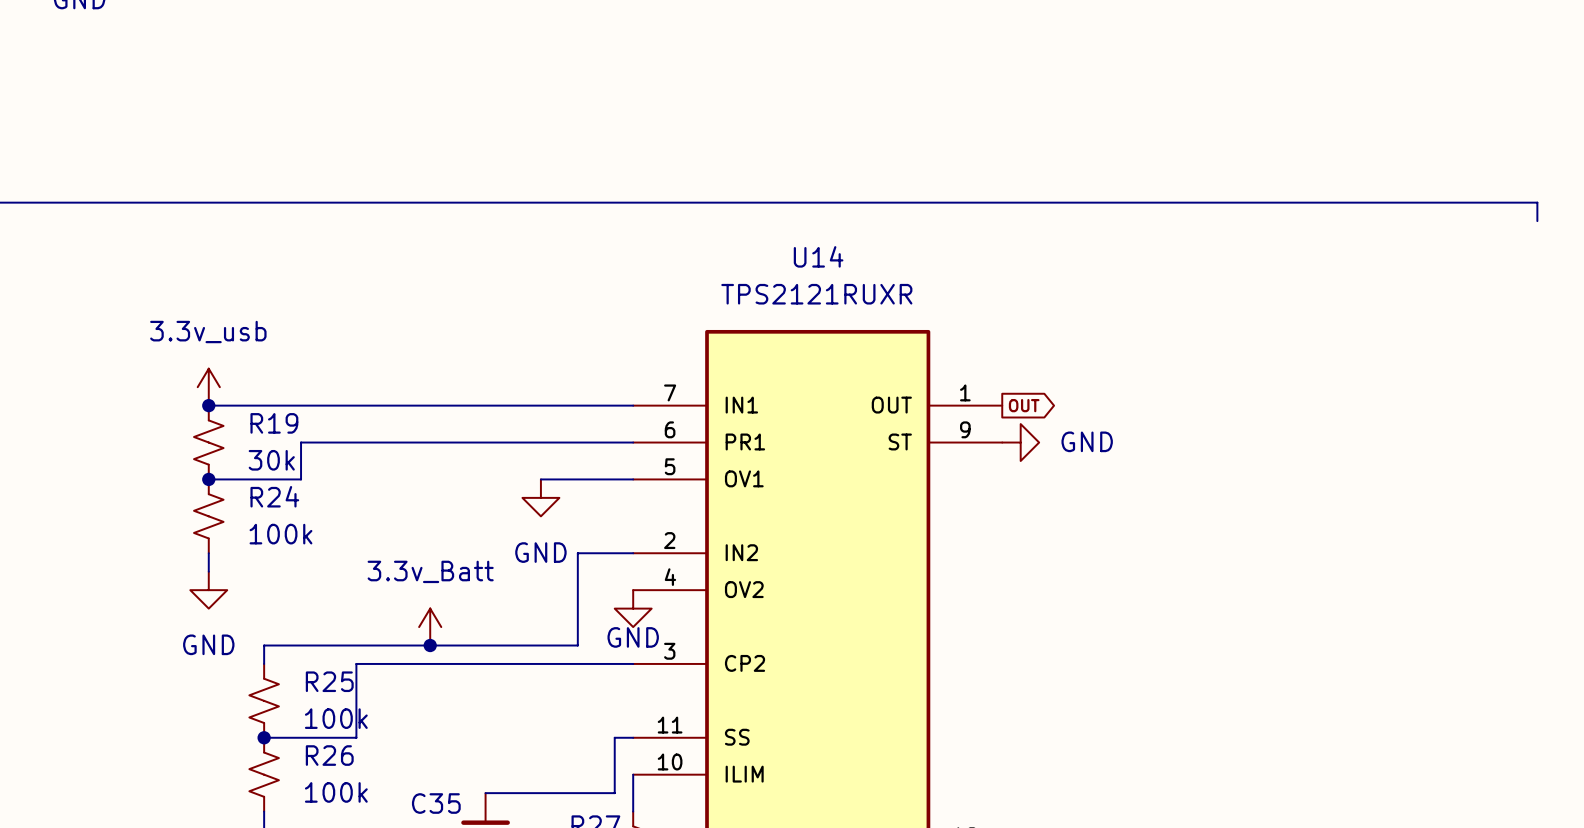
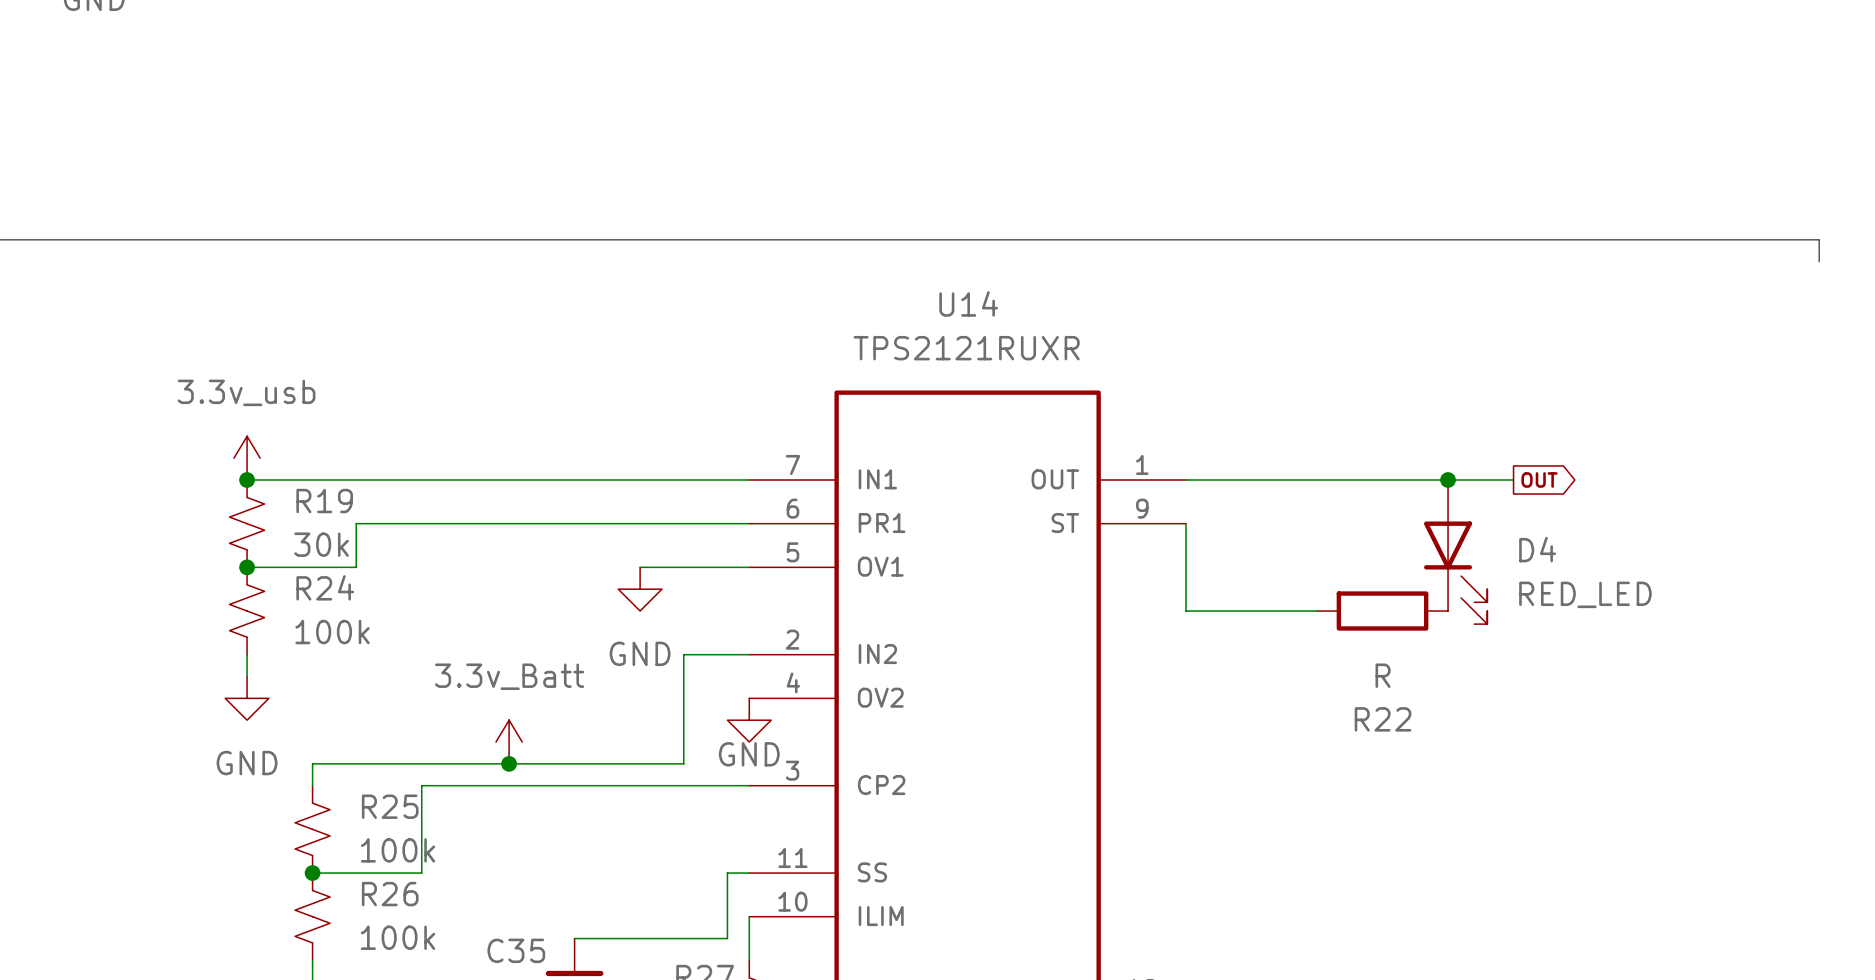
wire: none -> (1186, 480) (1513, 480)
global label position: OUT (1024, 405) -> OUT (1539, 480)
junction: none -> (1448, 480)
wire: none -> (1186, 523) (1186, 611) (1317, 611)
power symbol: GND (1020, 442) -> none
D4: none -> RED_LED (1455, 552)
R22: none -> R (1382, 611)

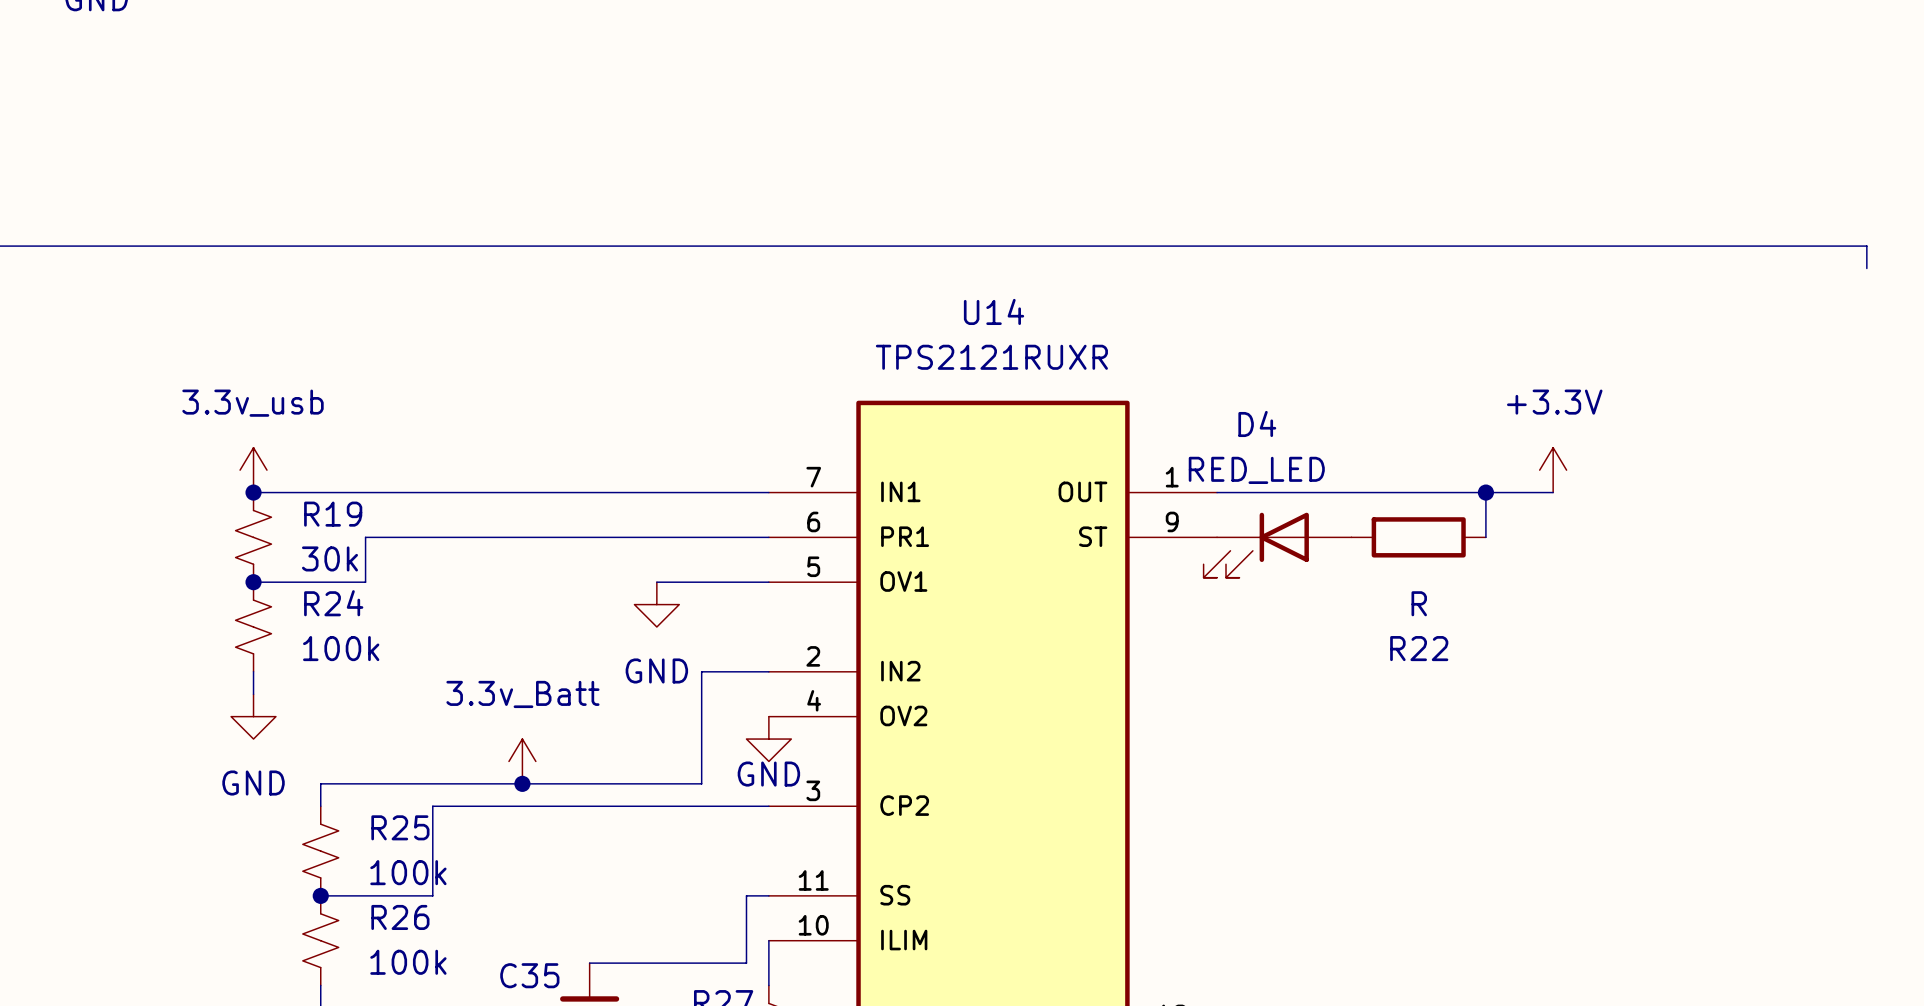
power symbol: none -> +3.3V (1553, 470)
global label: OUT (1539, 480) -> none
wire: (1186, 523) (1186, 611) (1317, 611) -> none
D4 name position: D4 (1537, 549) -> D4 (1257, 423)
D4 position: (1455, 552) -> (1277, 545)
D4 rotation: 0° (1455, 572) -> 90° clockwise (1256, 545)
D4 value position: RED_LED (1585, 594) -> RED_LED (1256, 470)
R22 position: (1382, 611) -> (1418, 537)

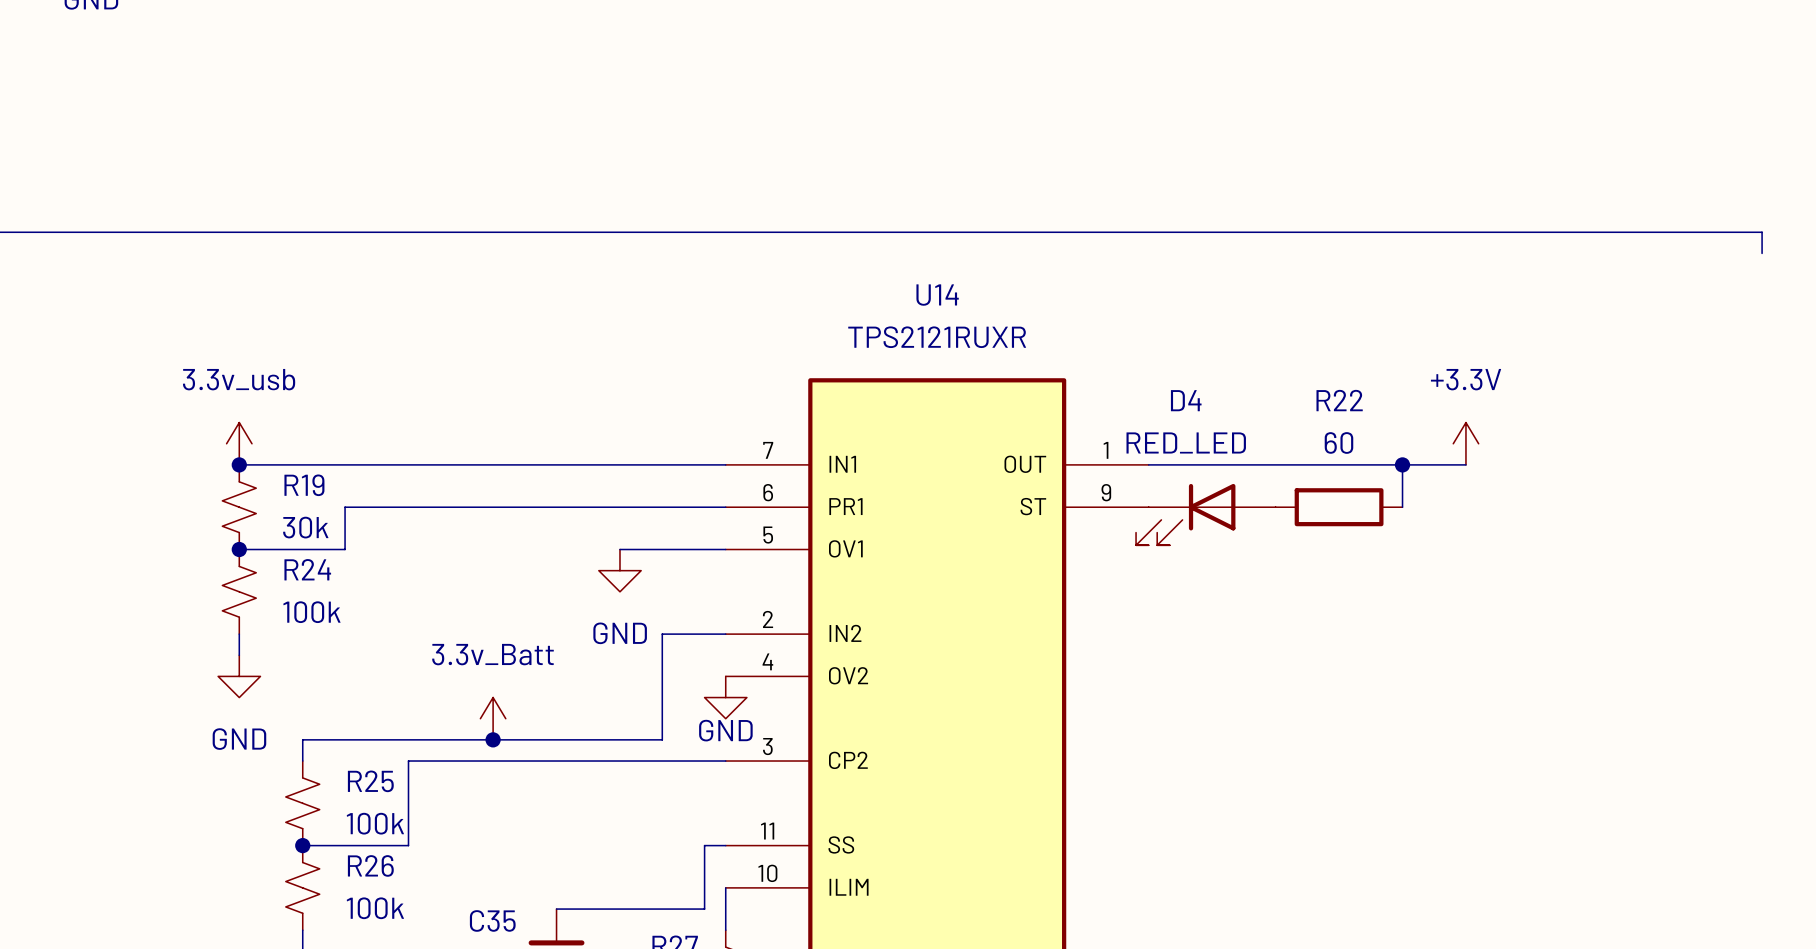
R22 value: R (1419, 603) -> 60 (1338, 442)
R22 name position: R22 (1419, 648) -> R22 (1339, 400)

